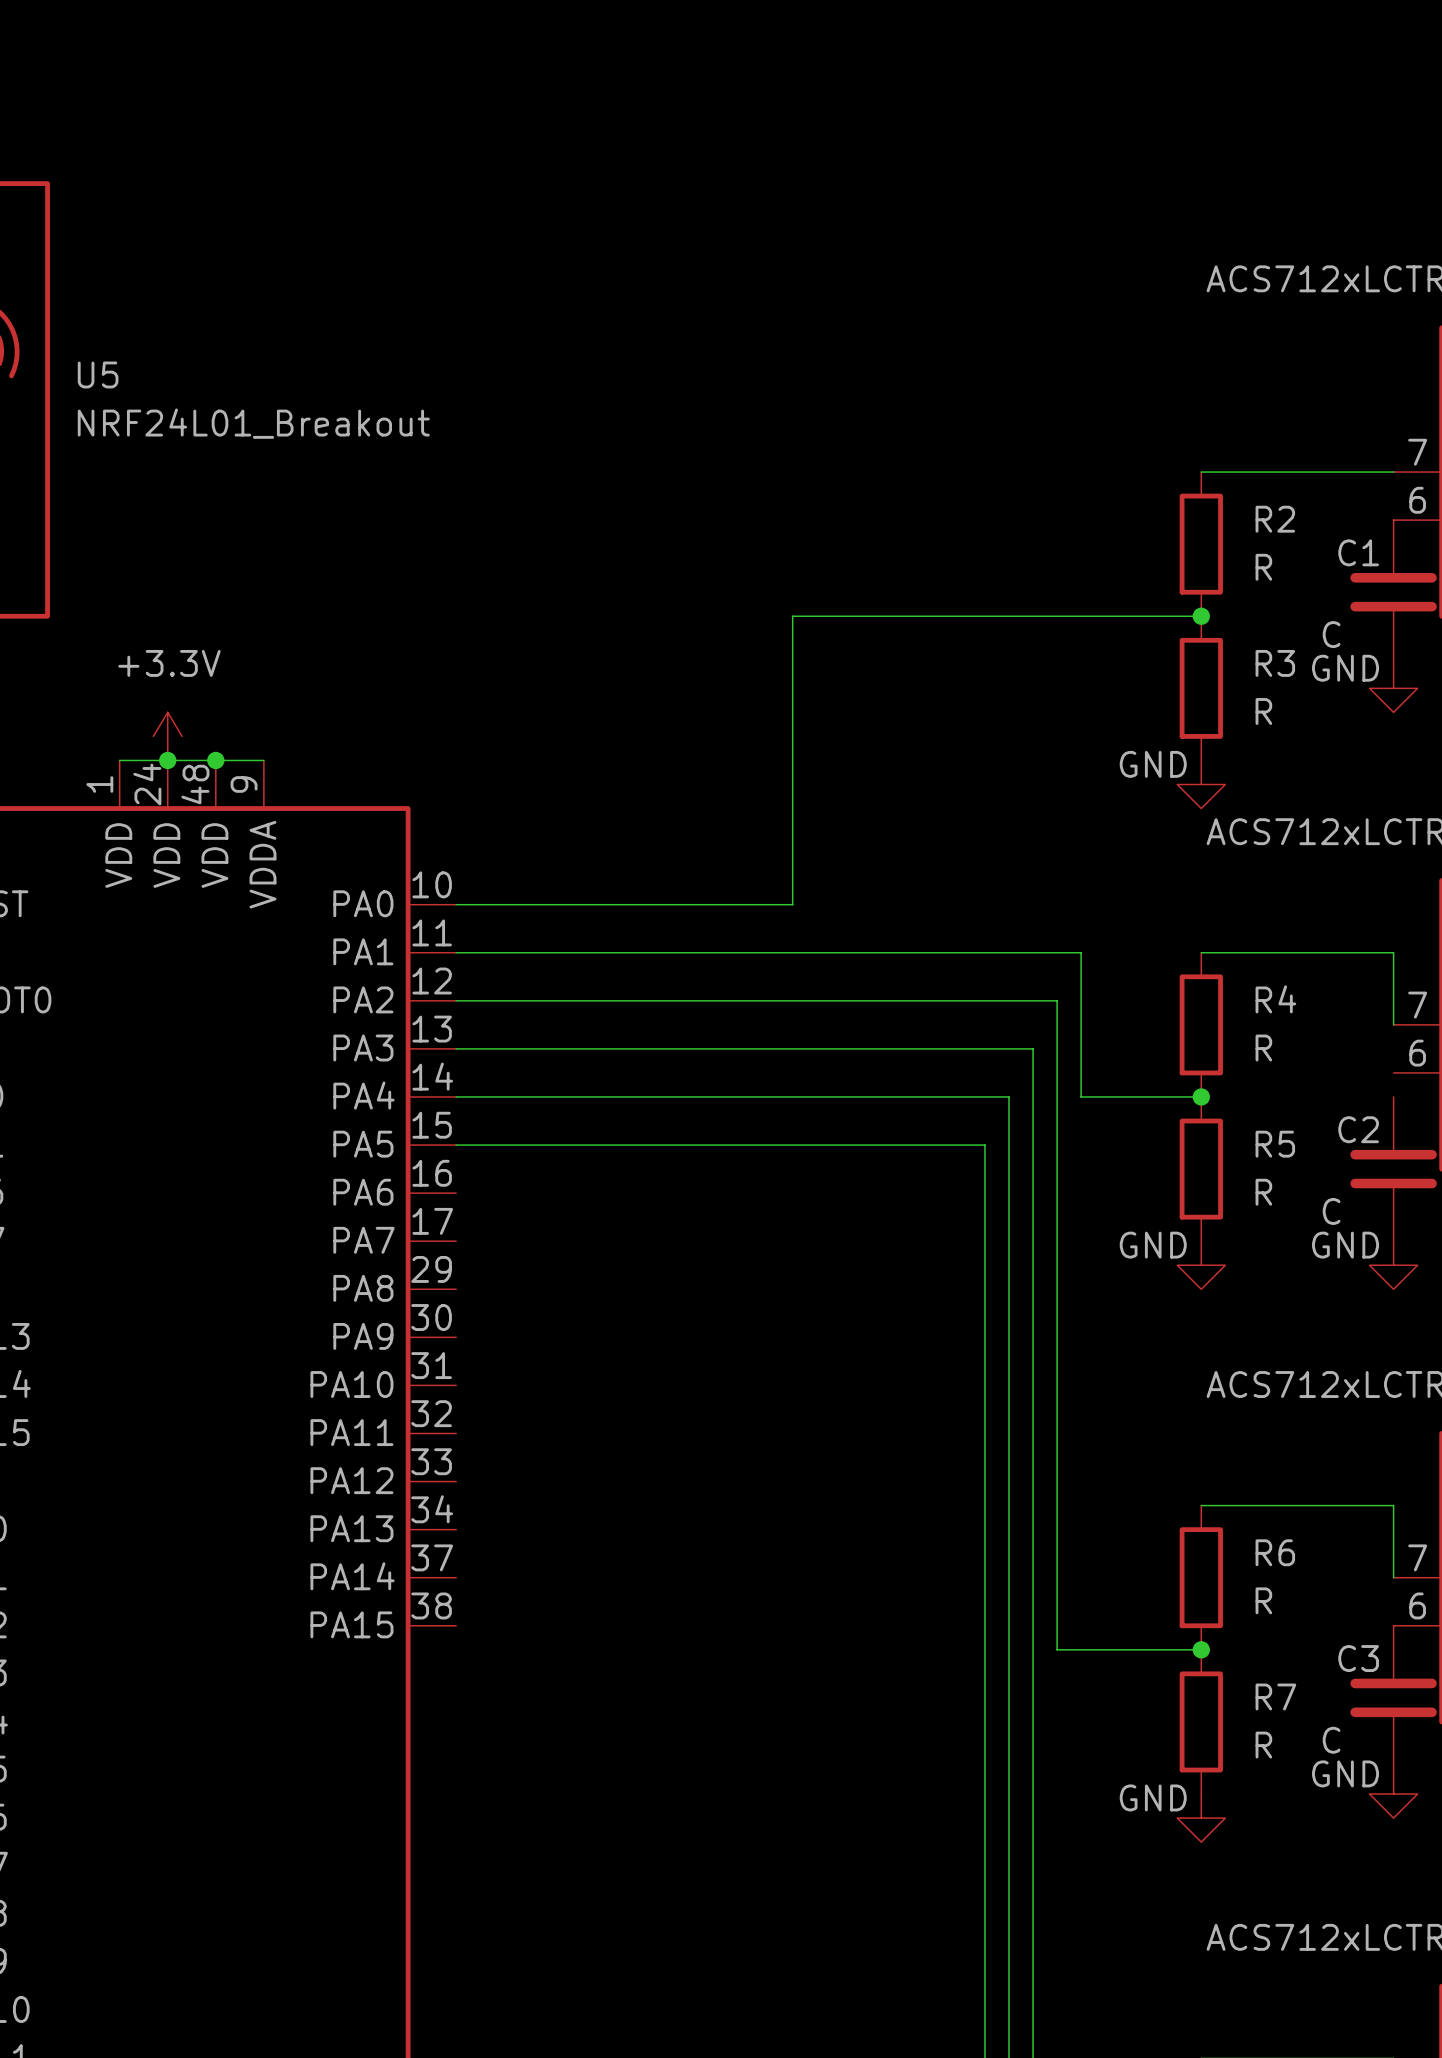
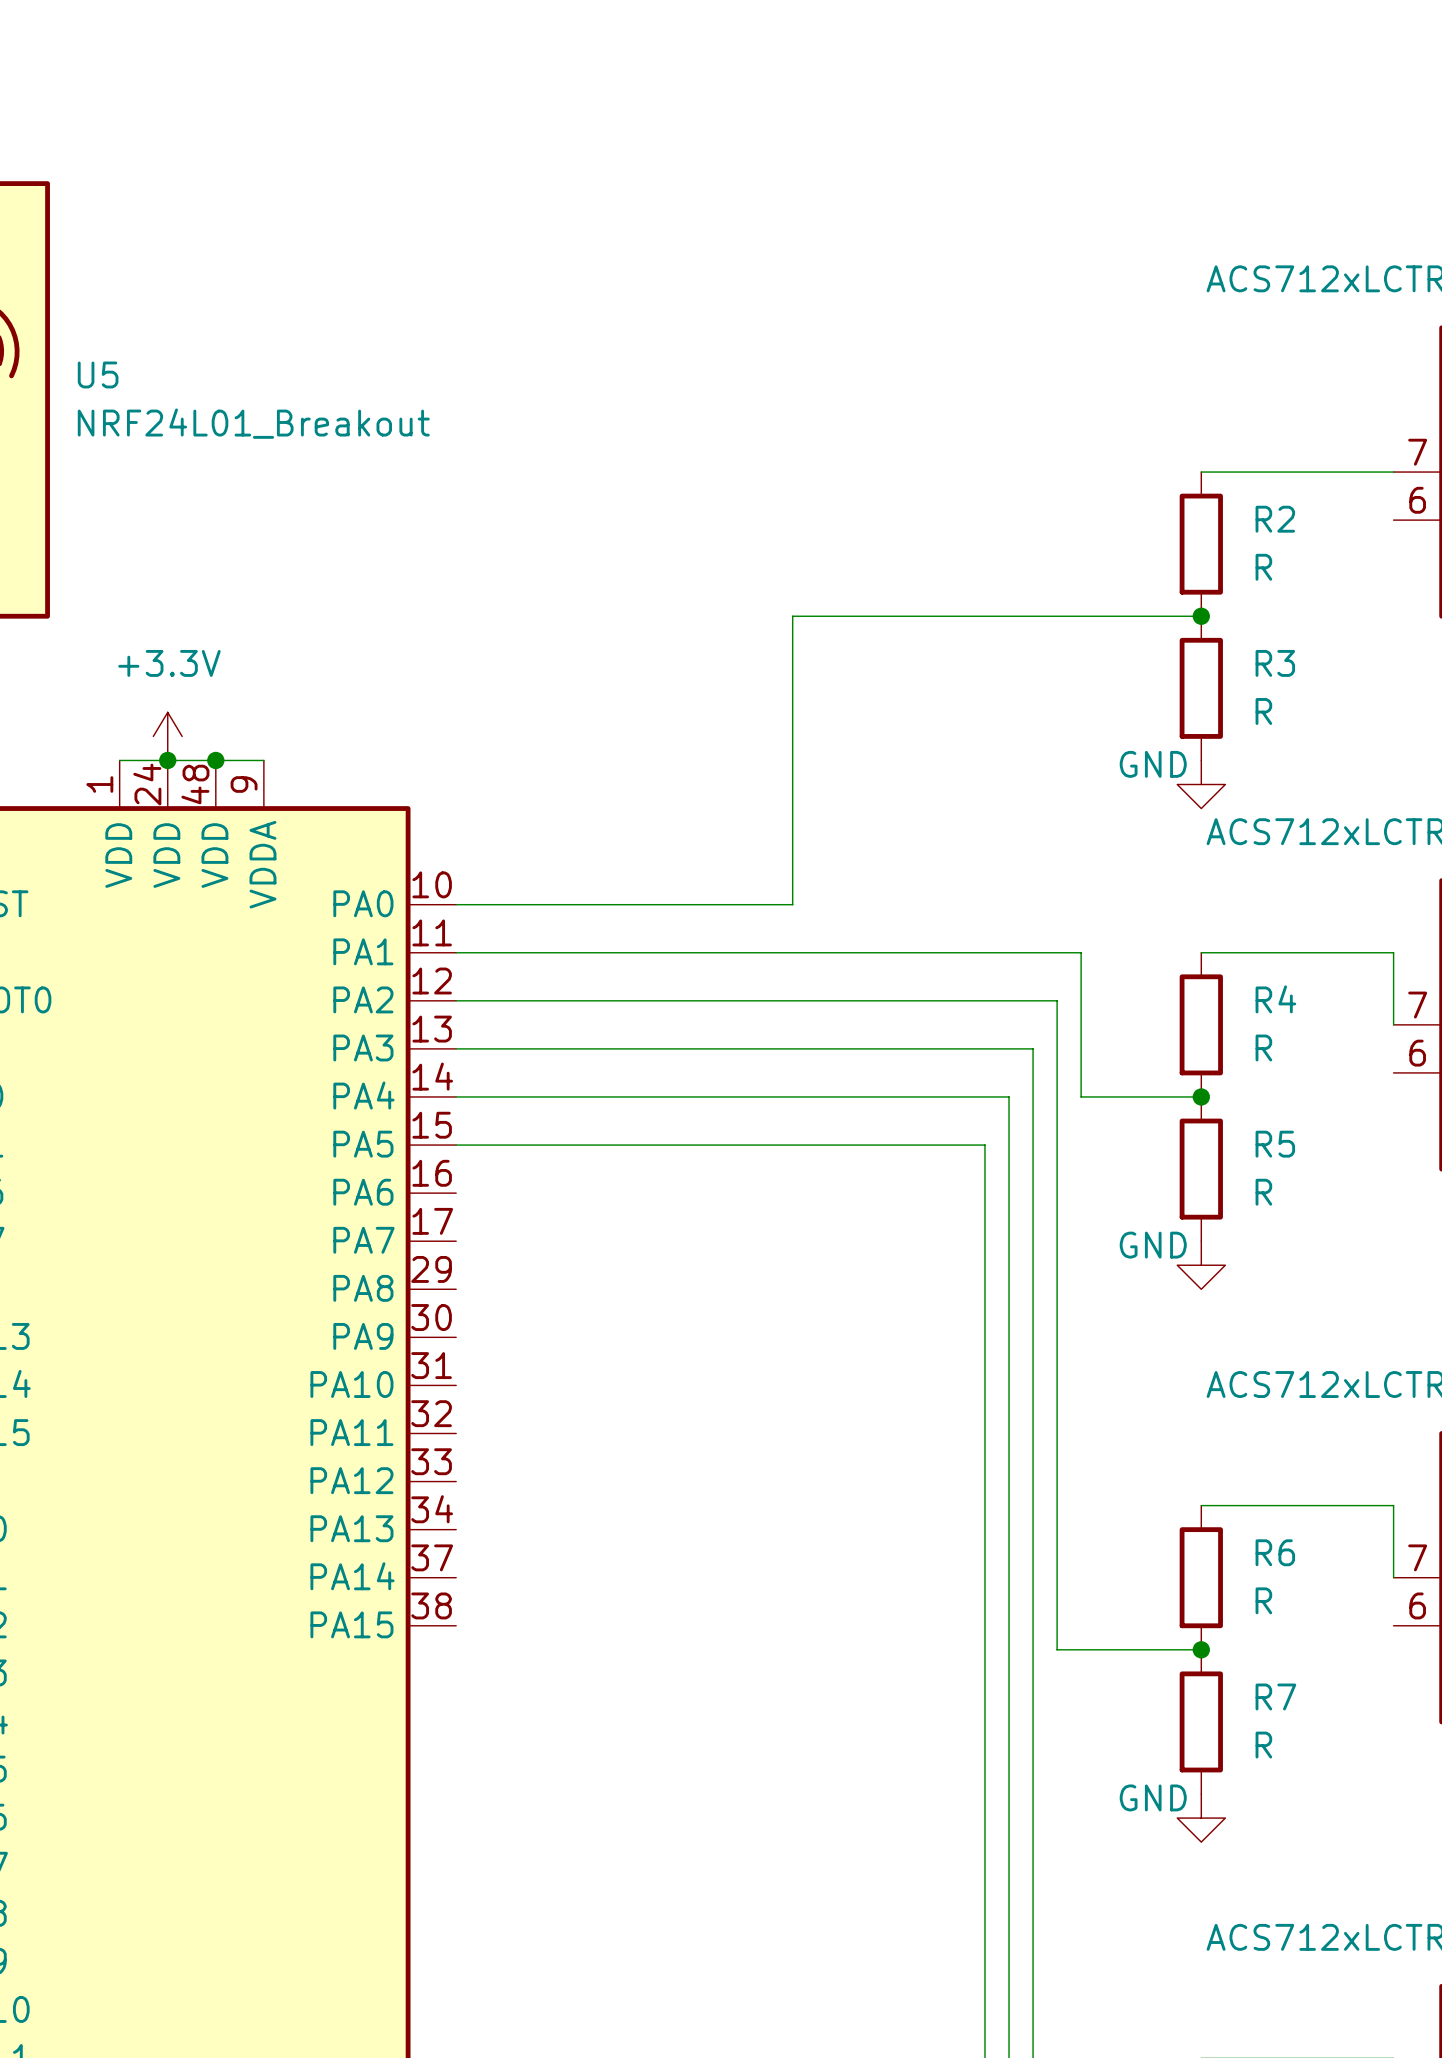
C1: C (1393, 592) -> none
power symbol: GND (1393, 688) -> none
C2: C (1393, 1169) -> none
power symbol: GND (1393, 1265) -> none
C3: C (1393, 1697) -> none
power symbol: GND (1393, 1794) -> none

